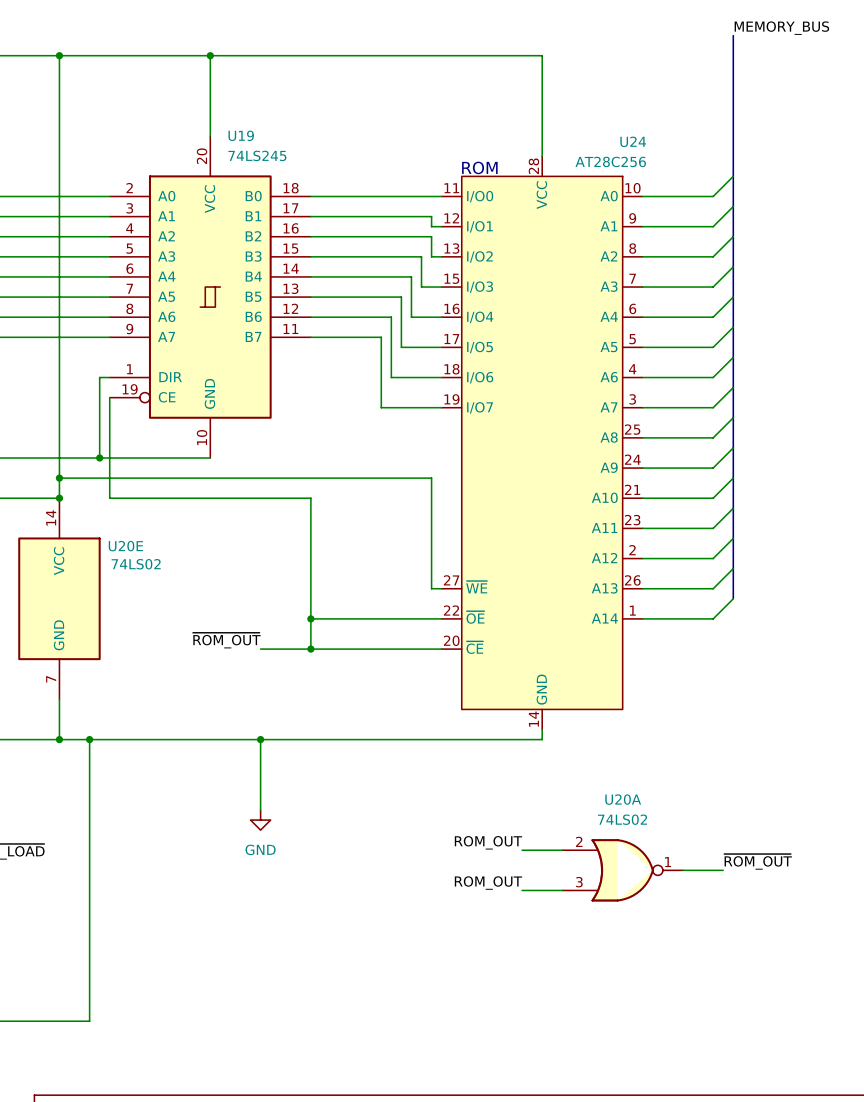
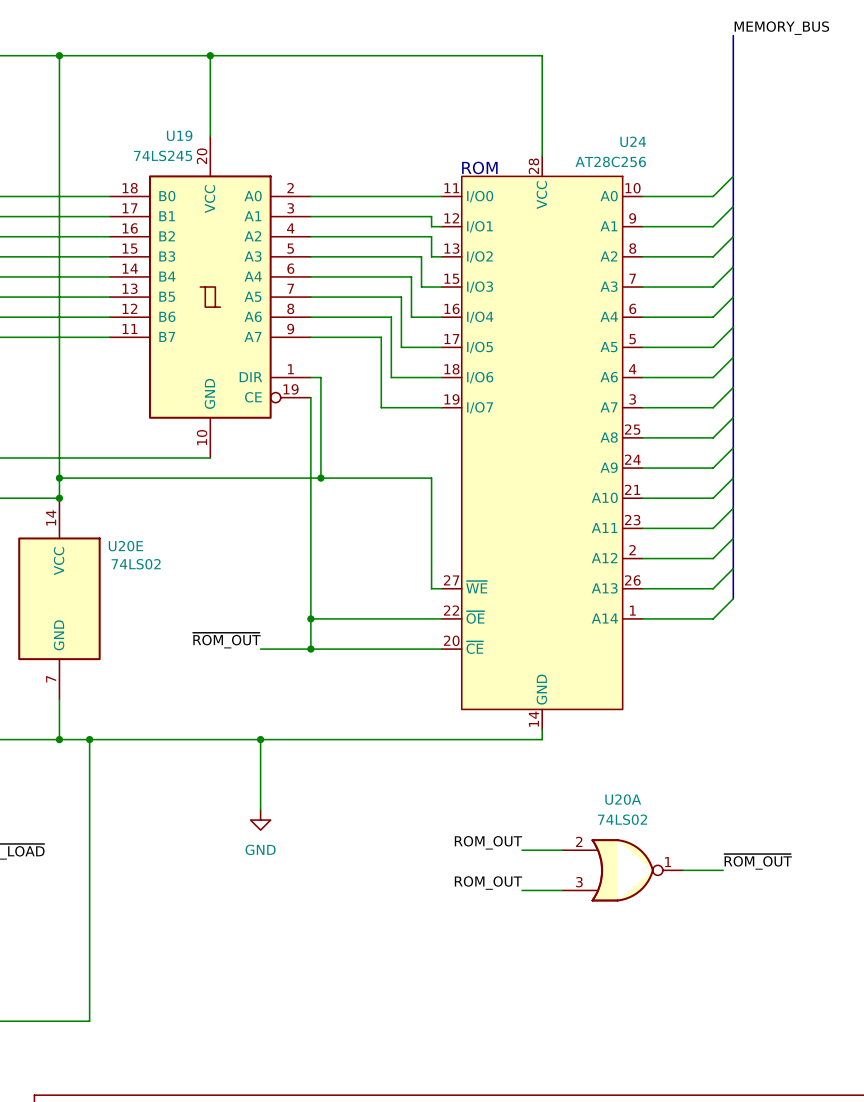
U19 flip: as is (210, 297) -> left-right (210, 297)
wire: (109, 377) (99, 377) (99, 457) -> none
wire: none -> (310, 377) (320, 377) (320, 478)
wire: (109, 397) (109, 498) (310, 498) -> (310, 397) (310, 498)
junction: (99, 457) -> none
junction: none -> (320, 478)

